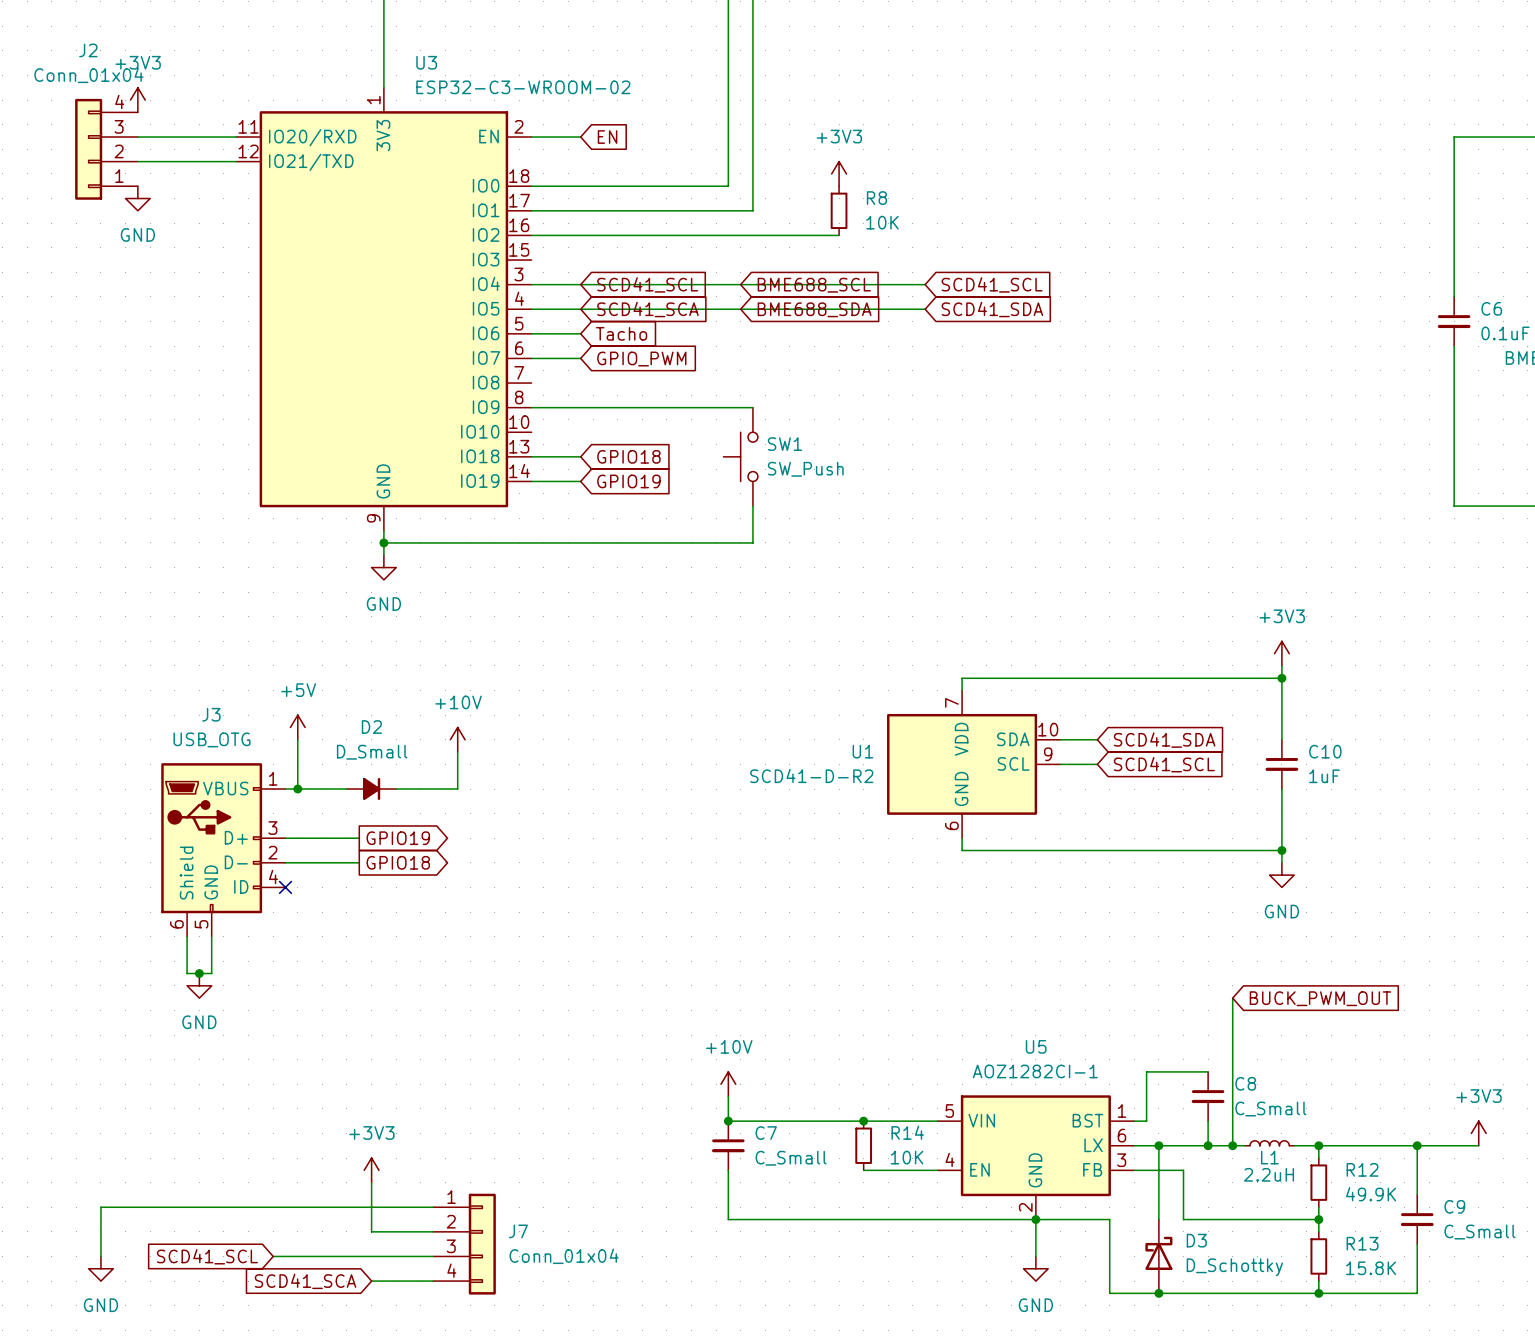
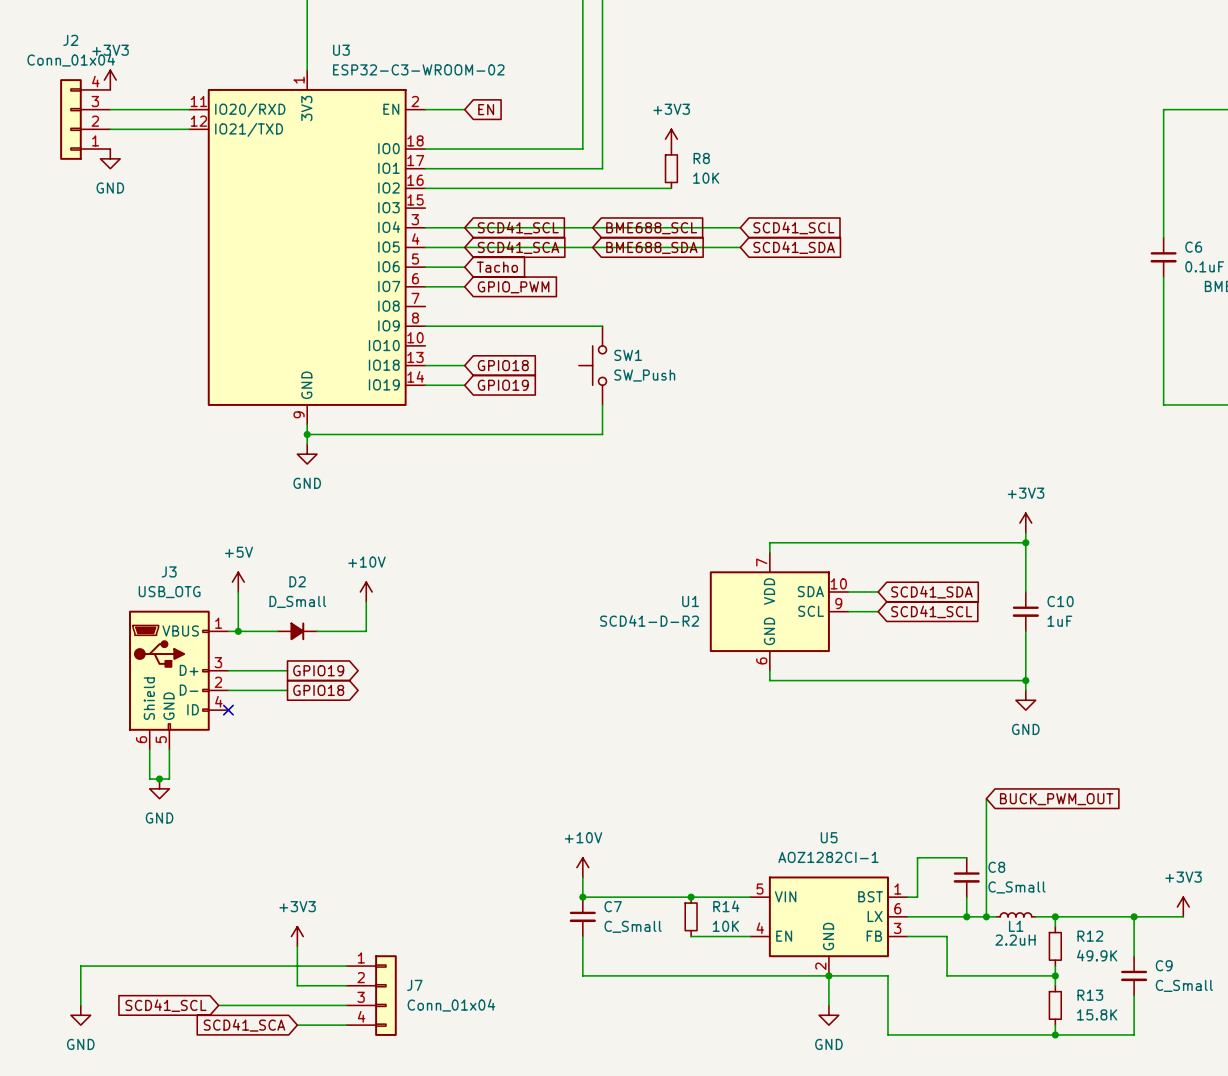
wire: (1158, 1145) (1158, 1219) -> none
junction: (1158, 1145) -> none
D3: D_Schottky (1158, 1256) -> none
junction: (1158, 1293) -> none

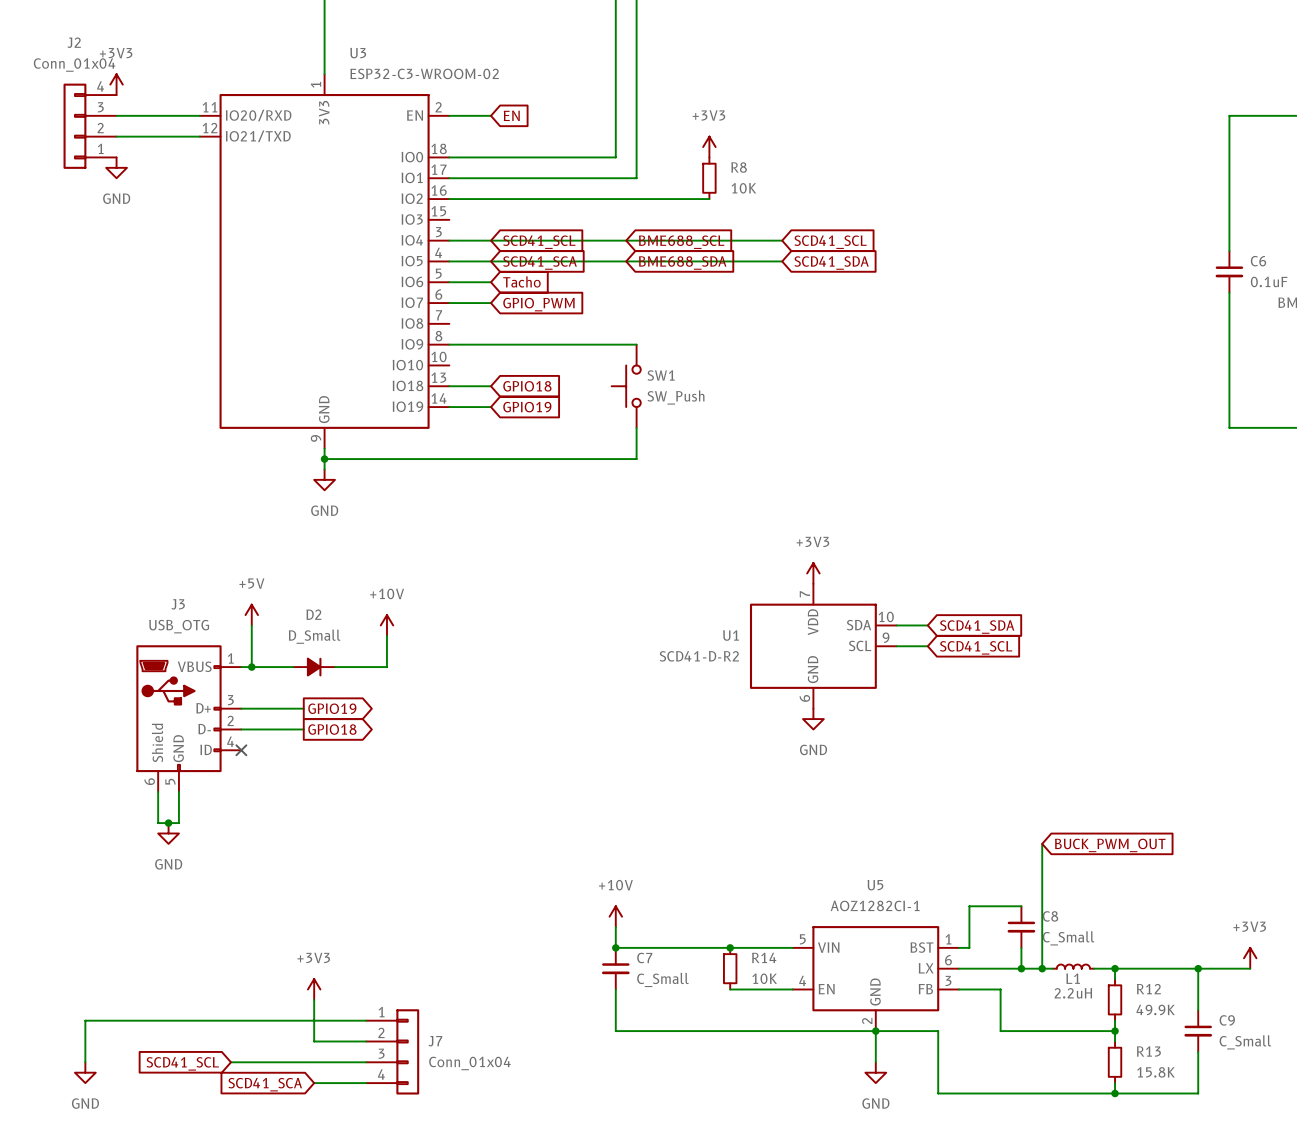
power symbol: +3V3 (1025, 523) -> none
wire: (1025, 532) (1025, 591) -> none
power symbol: none -> +3V3 (813, 573)
wire: (1025, 542) (769, 542) (769, 552) -> none
junction: (1025, 542) -> none
C10: 1uF (1025, 611) -> none
wire: (1025, 631) (1025, 690) -> none
wire: (769, 670) (769, 680) (1025, 680) -> none
power symbol: none -> GND (813, 719)
junction: (1025, 680) -> none
power symbol: GND (1025, 700) -> none

